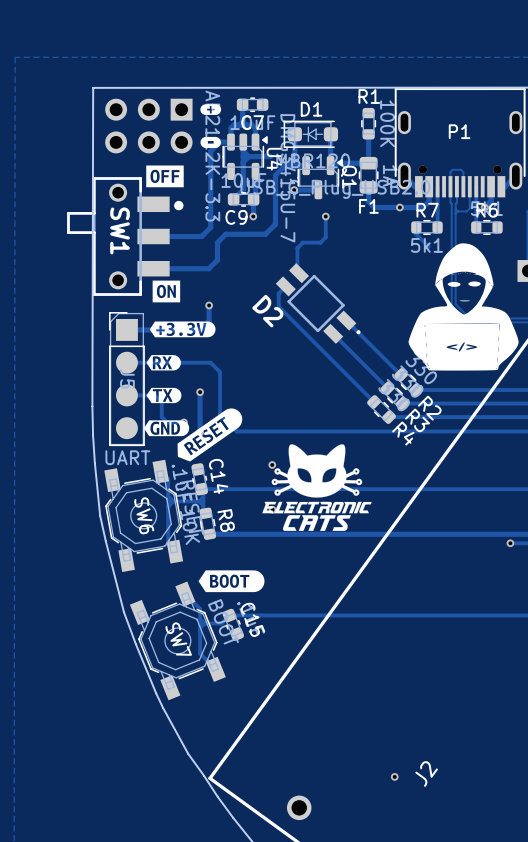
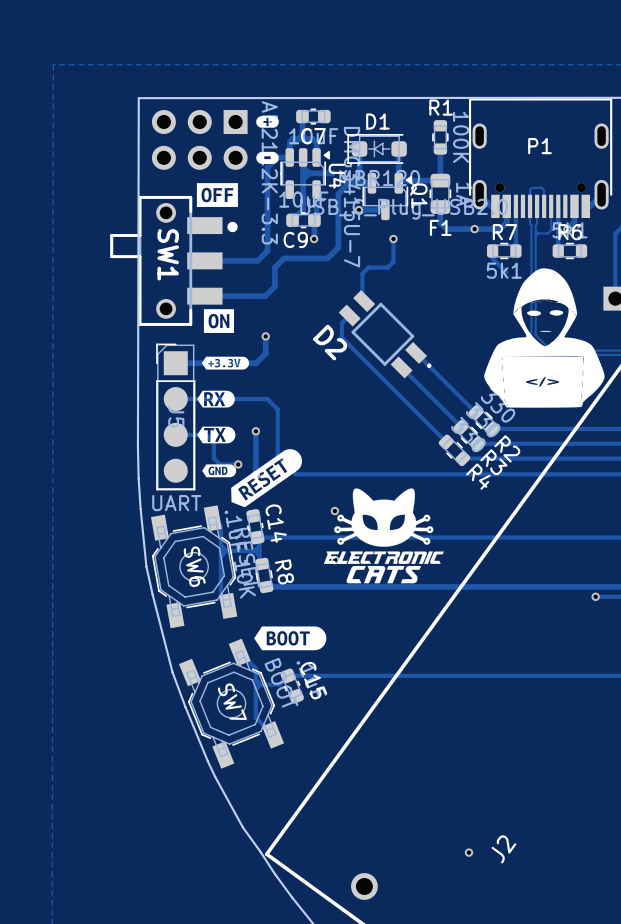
drawing shape: [149, 321, 216, 338] -> [201, 356, 250, 370]
drawing shape: [143, 420, 190, 437] -> [202, 464, 237, 478]

